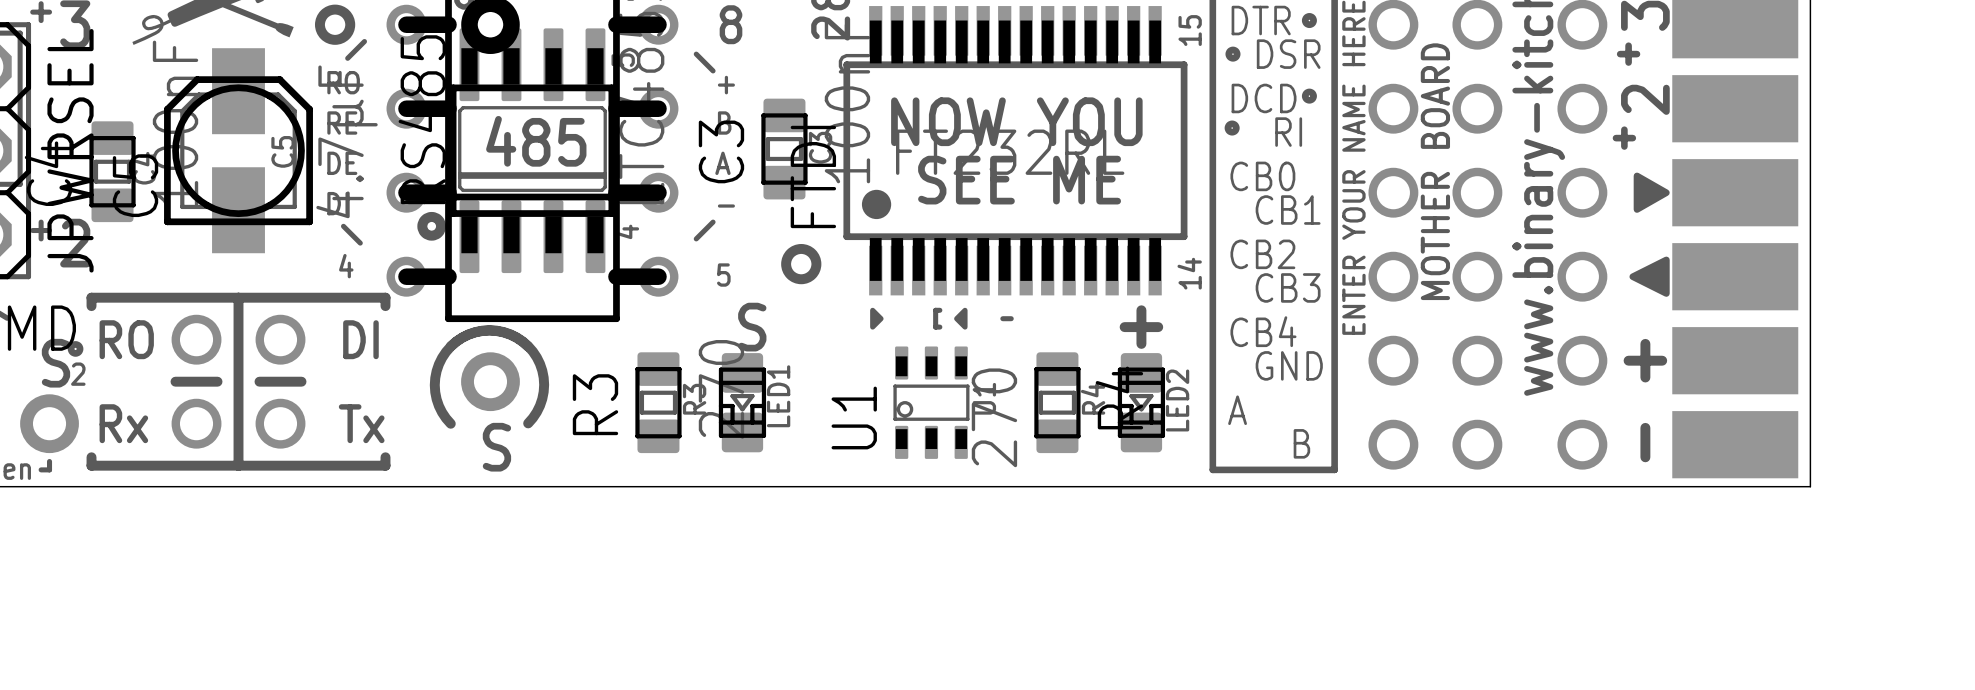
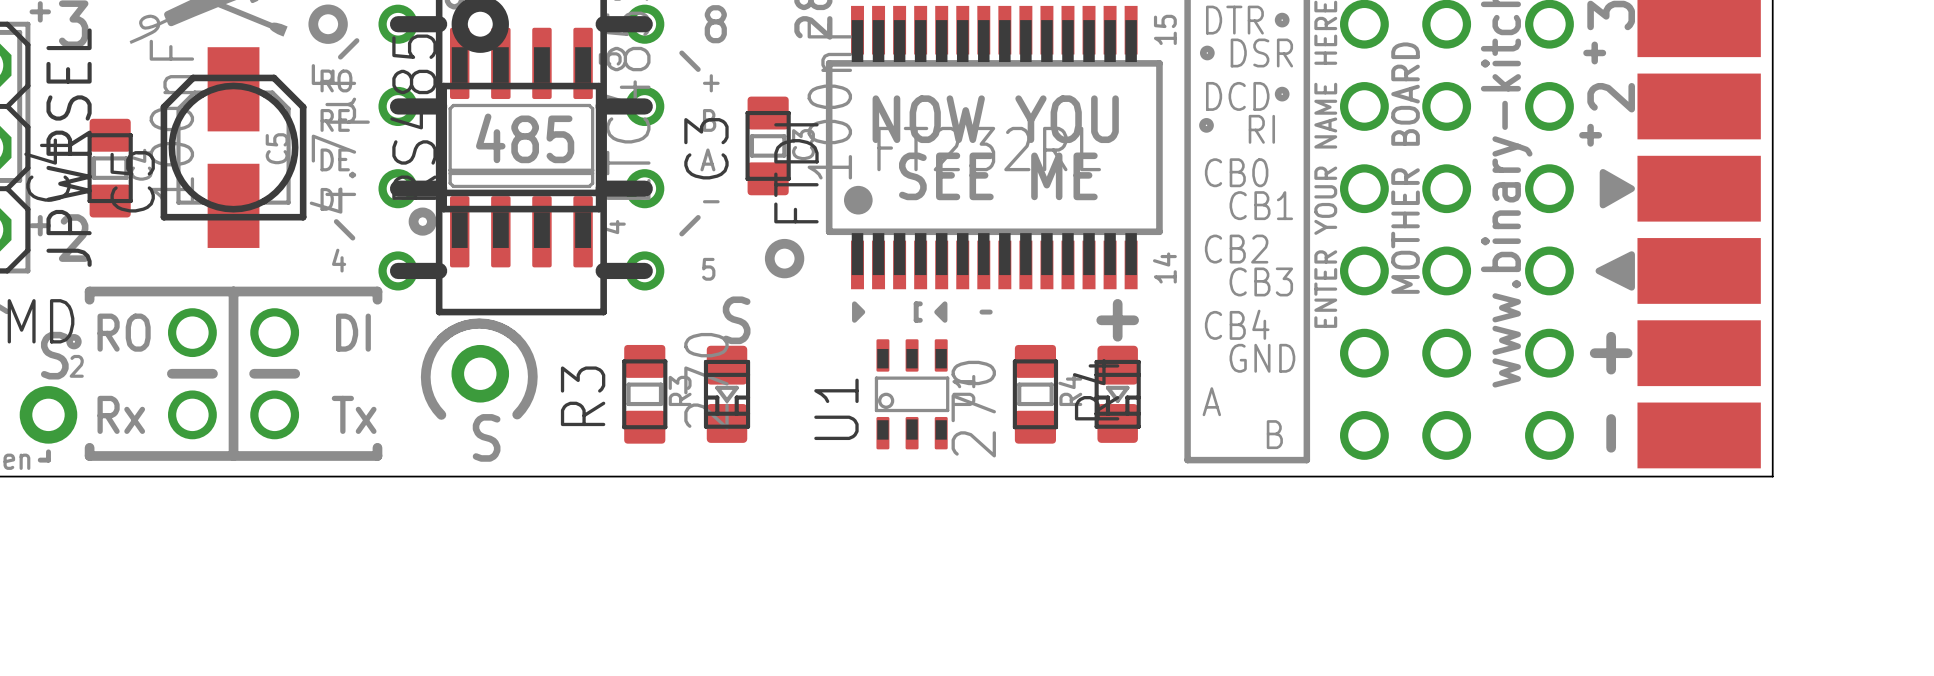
text: LED1 (778, 396) -> none
text: LED2 (1177, 400) -> none

